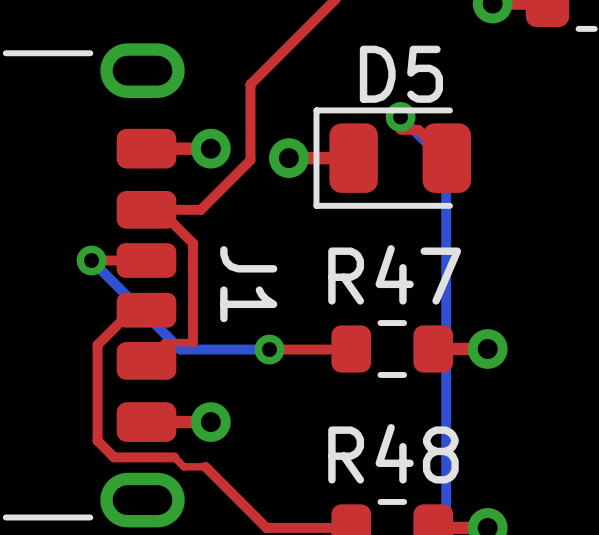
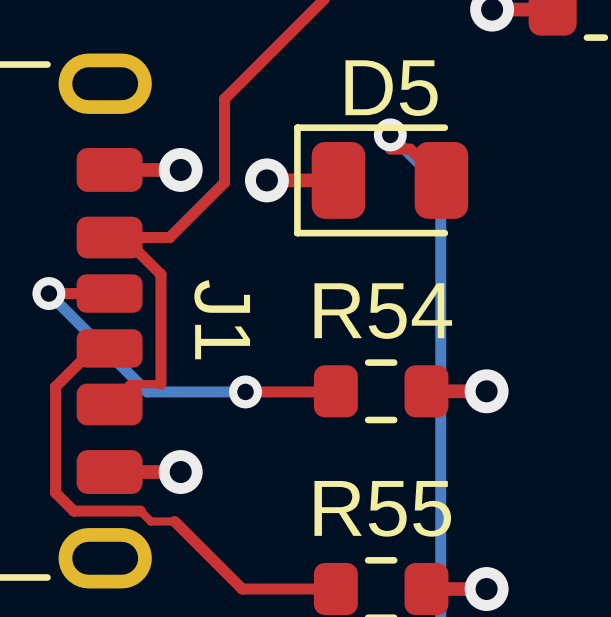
R47 name: R47 (394, 274) -> R54 (383, 311)
R48 name: R48 (393, 453) -> R55 (382, 508)

